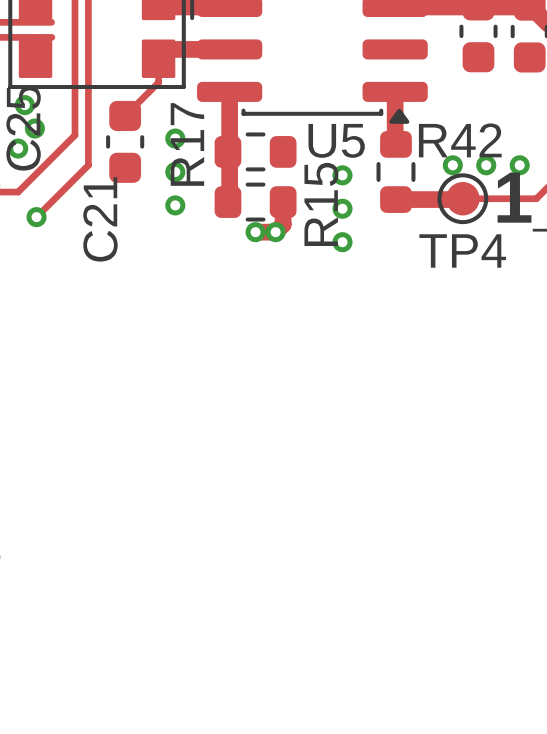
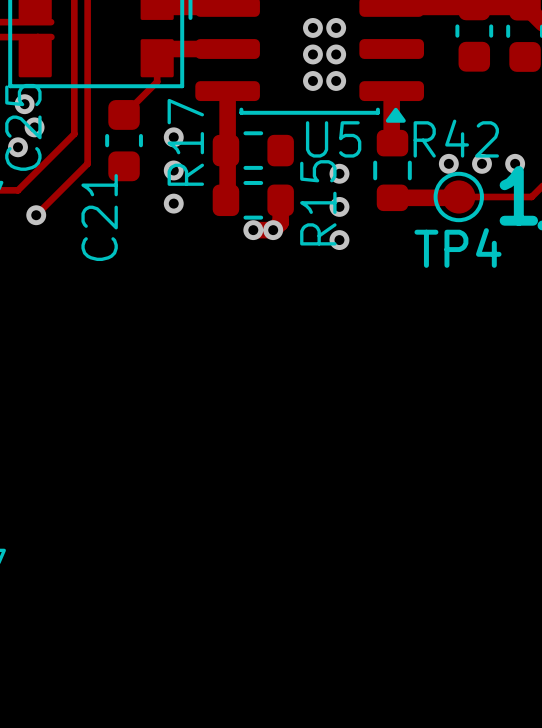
via: none -> (312, 27)
via: none -> (336, 27)
via: none -> (312, 54)
via: none -> (336, 54)
via: none -> (312, 80)
via: none -> (336, 80)

